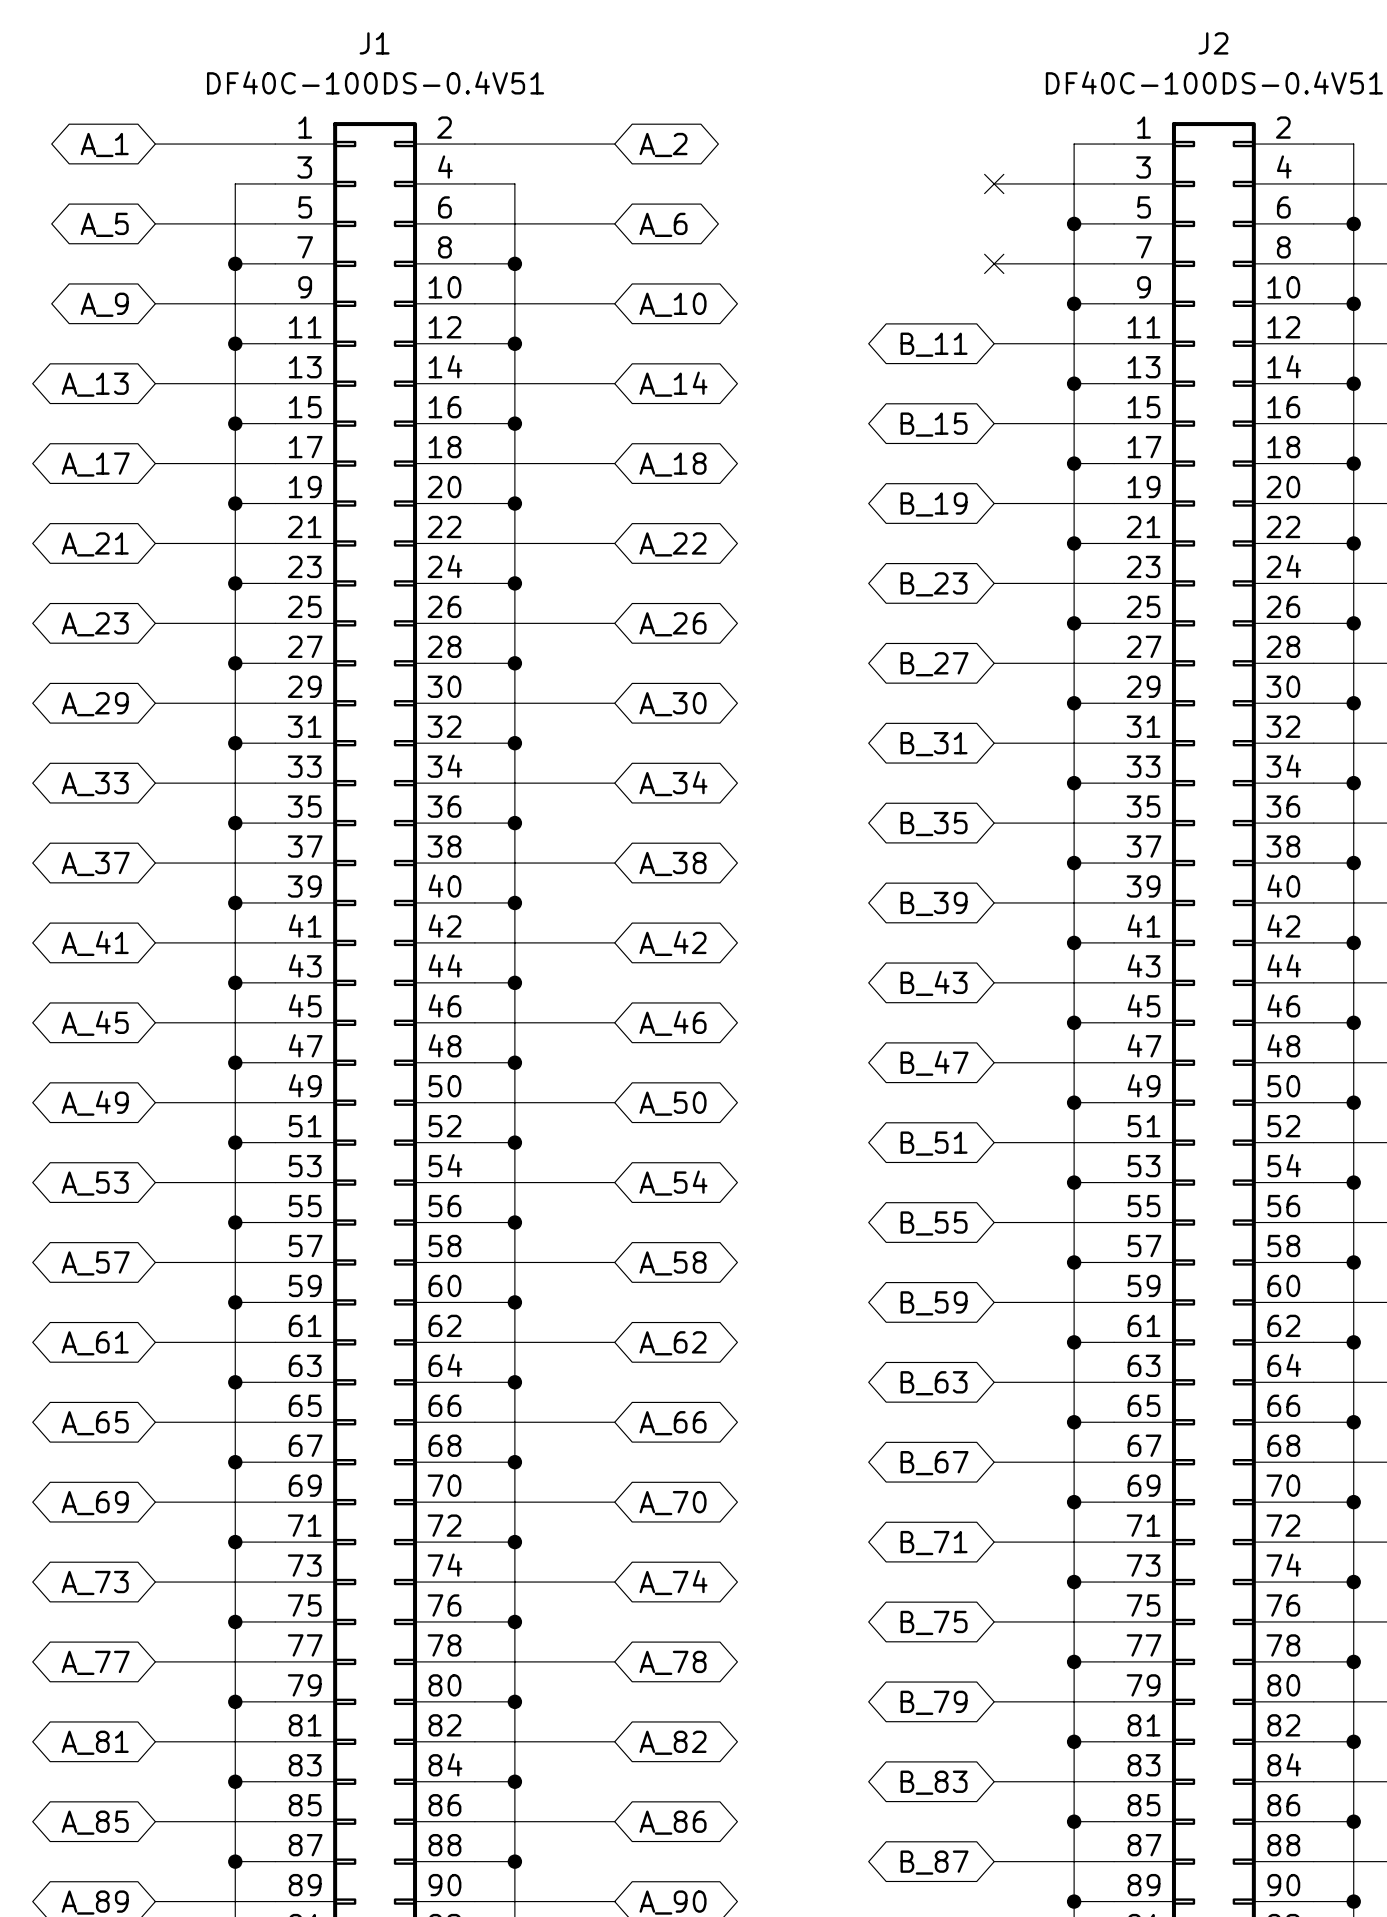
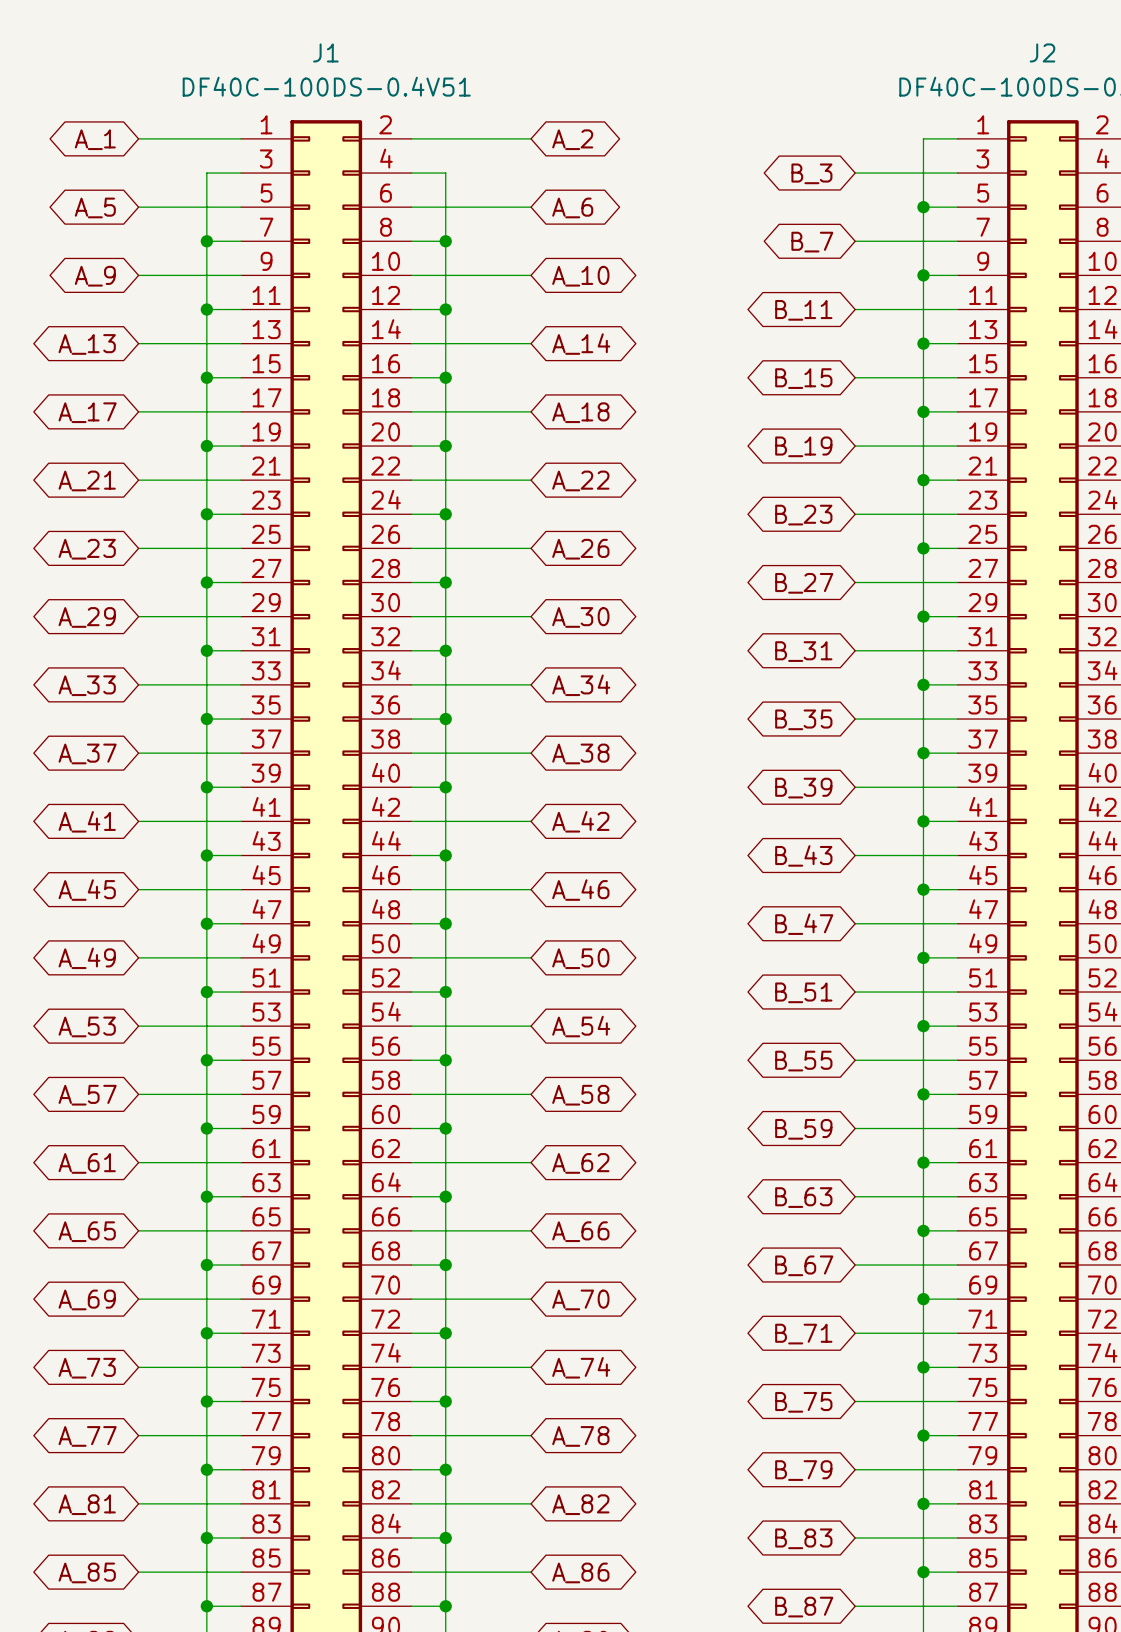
no-connect mark: (994, 183) -> none
global label: none -> B_3 (811, 173)
no-connect mark: (994, 263) -> none
global label: none -> B_7 (812, 242)

